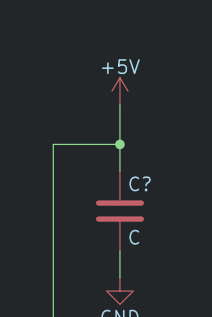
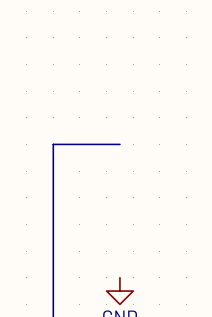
power symbol: +5V (119, 91) -> none
wire: (119, 104) (119, 171) -> none
junction: (119, 144) -> none
C?: C (119, 211) -> none
wire: (119, 251) (119, 277) -> none

